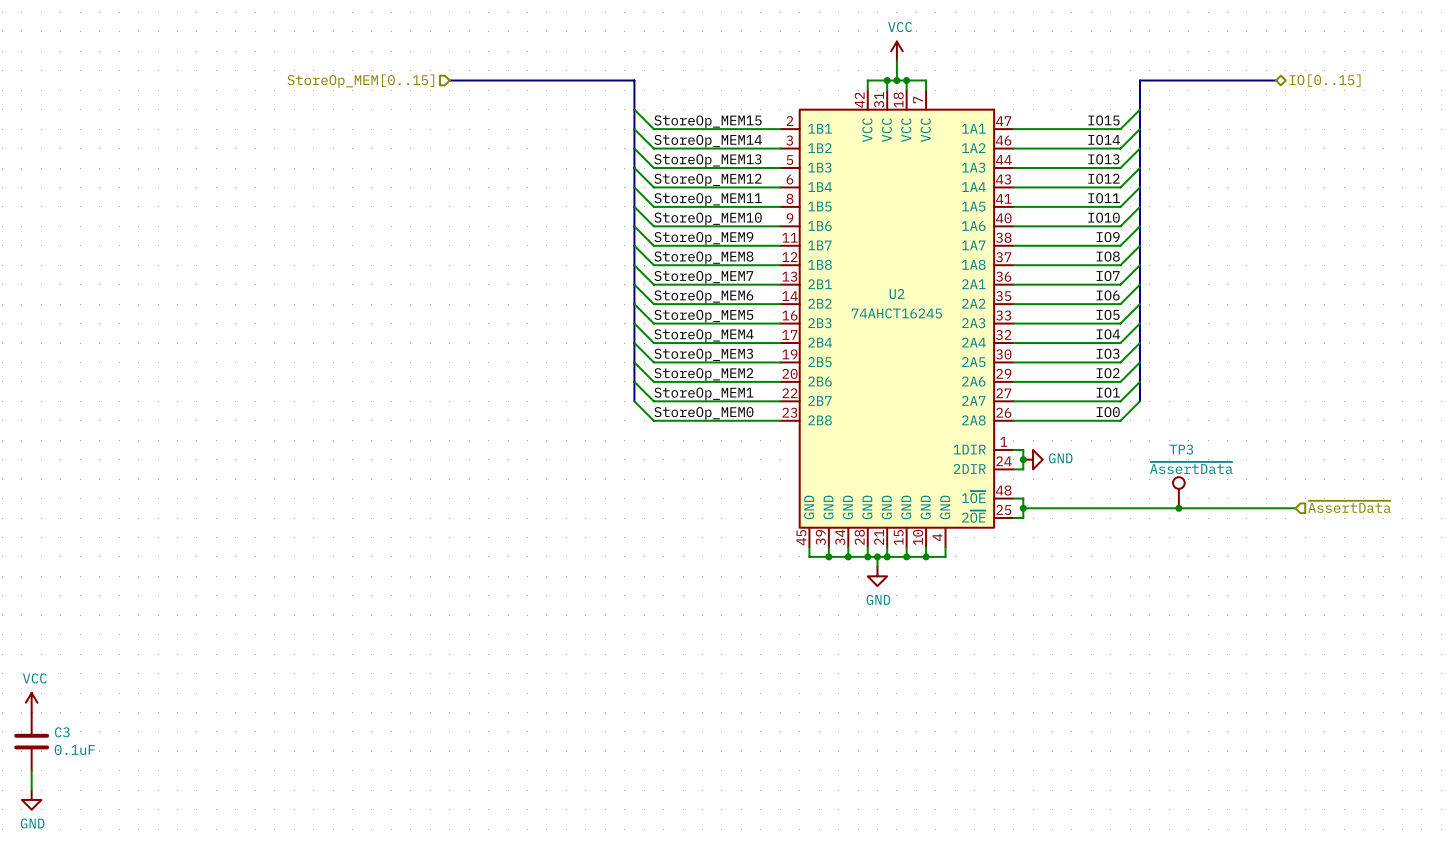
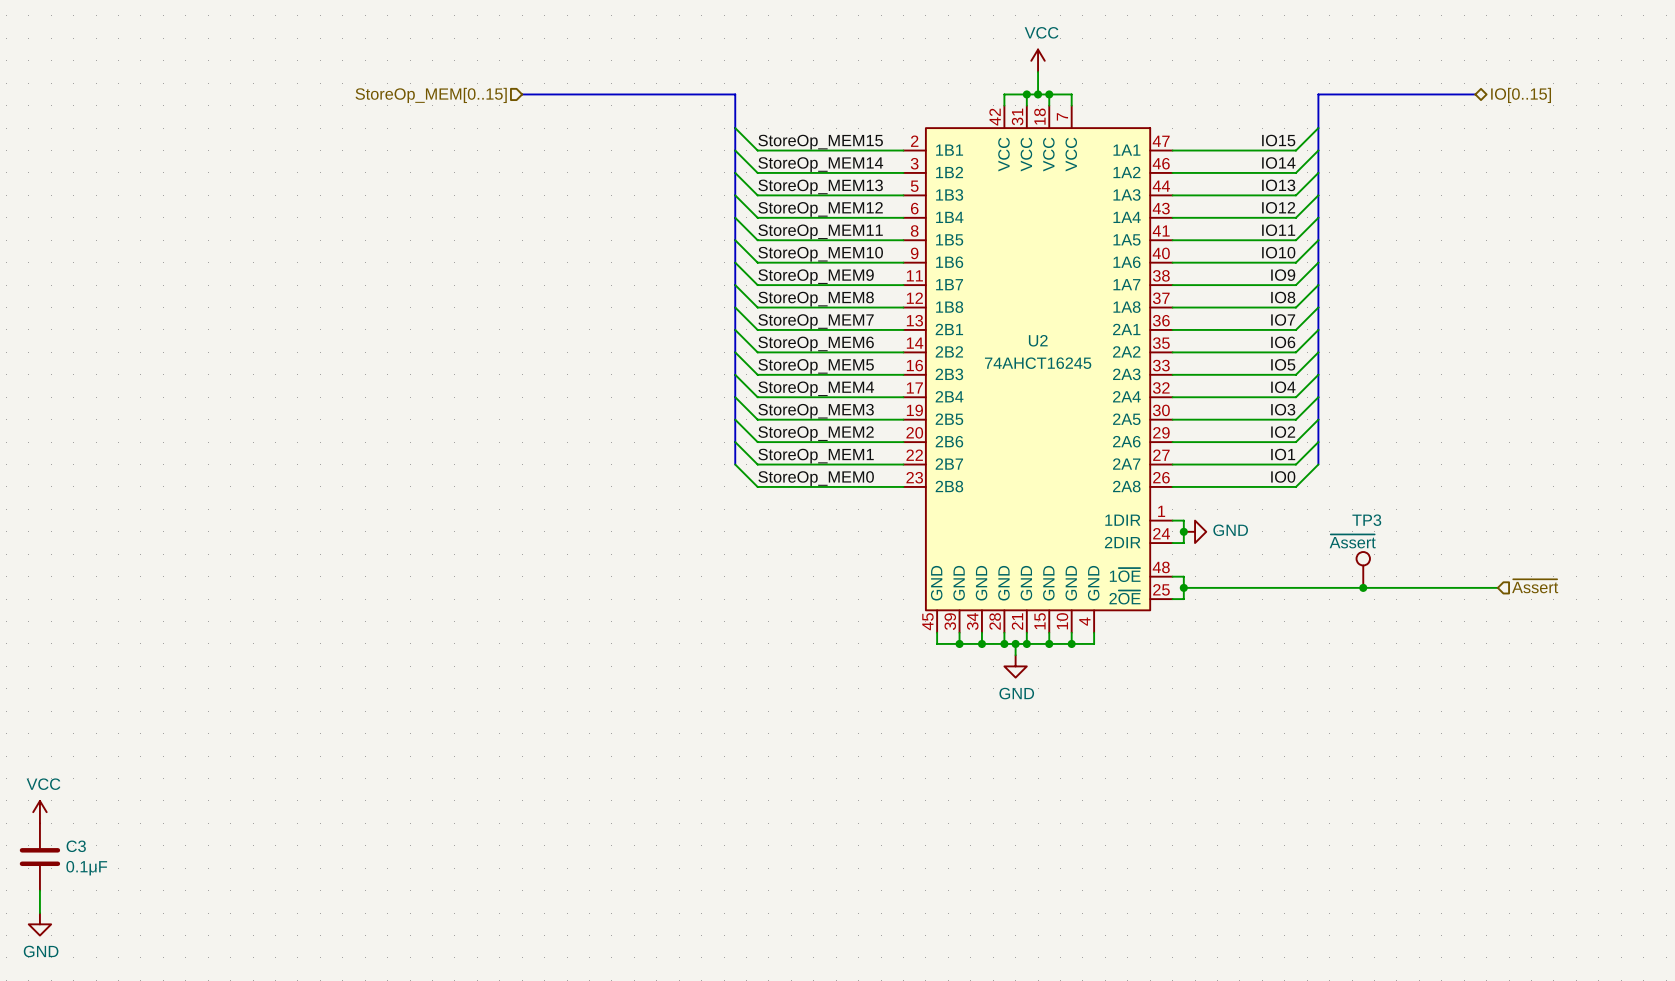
TP3 value: ~{AssertData} (1191, 467) -> ~{Assert} (1352, 541)
hierarchical label: ~{AssertData} (1349, 506) -> ~{Assert} (1535, 586)
C3 value: 0.1uF (74, 749) -> 0.1μF (86, 868)

